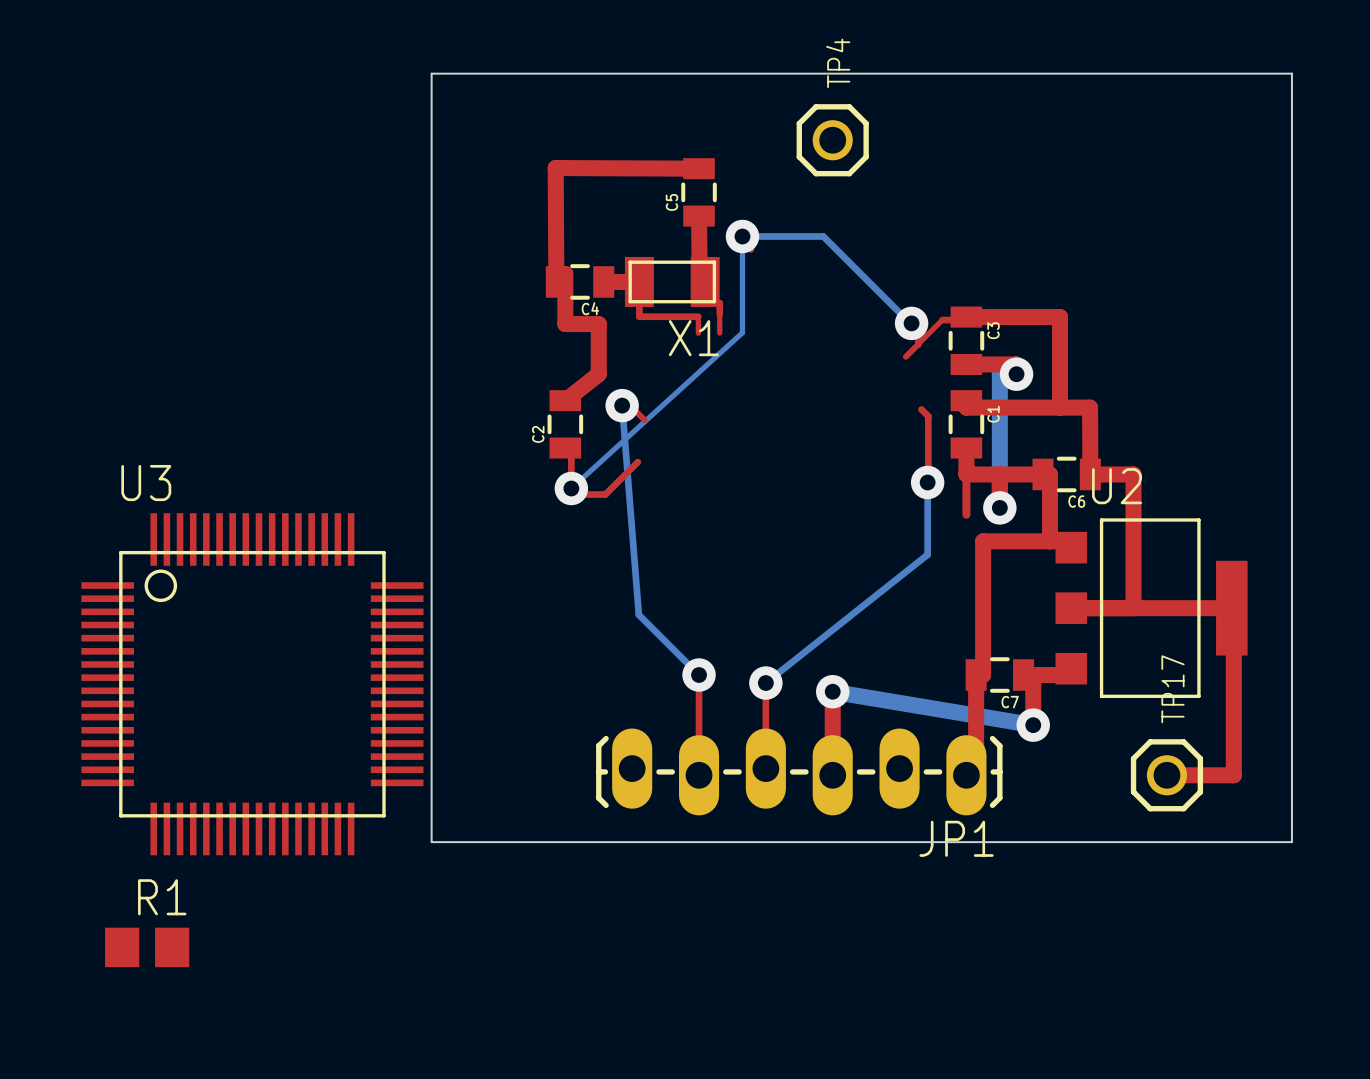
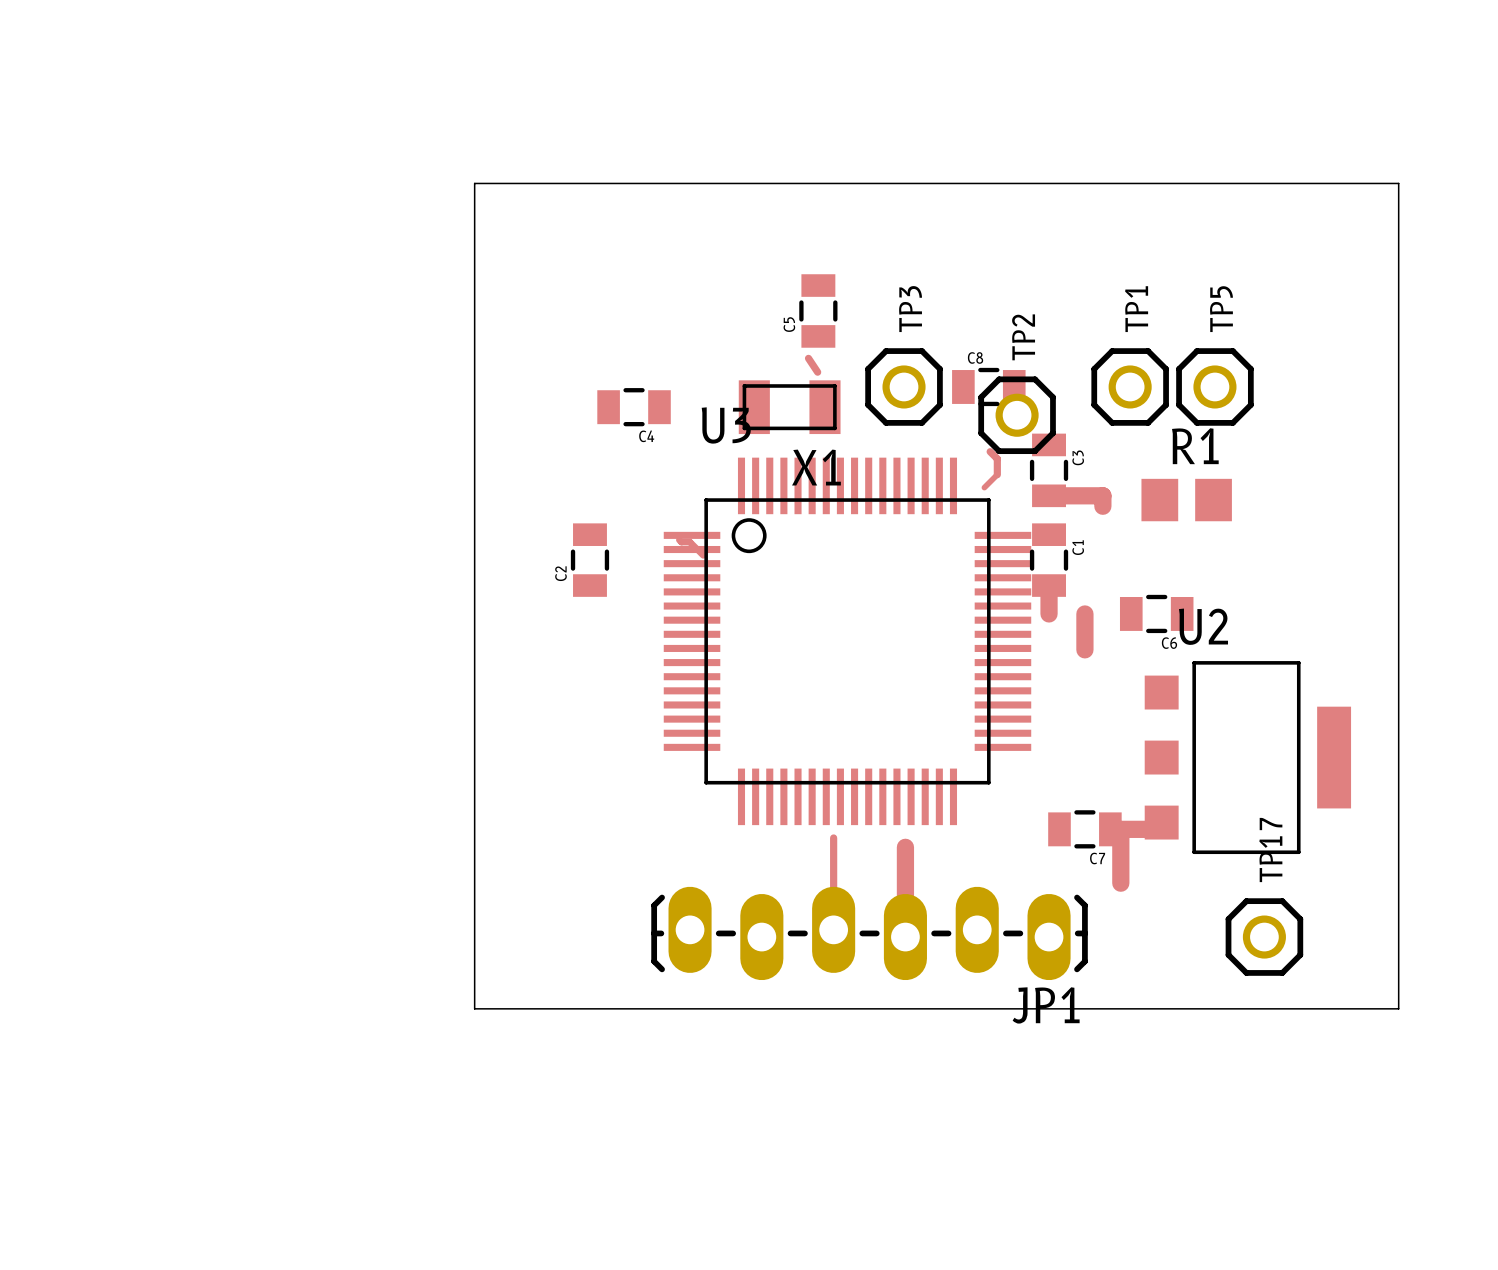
TP4: (832, 140) -> none
top track: (699, 168) (555, 168) (556, 281) (565, 273) (565, 324) (598, 324) (598, 374) -> none
C5 position: (699, 192) -> (818, 310)
top track: (699, 216) (699, 272) (715, 303) (719, 303) (719, 333) -> none
bottom track: (741, 236) (823, 236) (911, 323) -> none
bottom track: (742, 236) (742, 332) (571, 488) -> none
via: (742, 236) -> none
TP3: none -> (904, 386)
C8: none -> (988, 386)
TP1: none -> (1130, 386)
TP5: none -> (1214, 386)
top track: (603, 281) (639, 281) (639, 316) (698, 316) (698, 333) -> none
X1 position: (672, 281) -> (789, 407)
TP2: none -> (1017, 415)
via: (911, 323) -> none
top track: (905, 356) (942, 320) (963, 320) (966, 317) (1060, 317) (1060, 407) -> none
top track: (598, 374) (565, 400) (565, 398) -> none
bottom track: (1016, 374) (999, 374) (999, 507) -> none
via: (1016, 374) -> none
top track: (966, 398) (966, 407) (1090, 407) (1090, 474) (1133, 474) (1133, 608) -> none
bottom track: (622, 405) (638, 614) (699, 675) -> none
via: (622, 405) -> none
top track: (921, 409) (928, 416) (927, 482) -> none
C2 position: (565, 424) -> (589, 560)
top track: (565, 448) (571, 454) (571, 488) (577, 494) (605, 494) (637, 462) -> none
bottom track: (927, 482) (927, 554) (765, 683) -> none
via: (927, 482) -> none
via: (571, 488) -> none
via: (999, 507) -> none
top track: (966, 514) (966, 474) (1049, 474) (1049, 541) -> none
top track: (1071, 547) (1071, 541) (983, 541) (983, 675) (976, 675) (976, 775) (966, 775) -> none
top track: (1071, 608) (1233, 608) (1233, 775) (1166, 775) -> none
top track: (699, 675) (699, 775) -> none
via: (699, 675) -> none
via: (765, 683) -> none
U3 position: (252, 684) -> (847, 641)
bottom track: (832, 691) (1033, 725) -> none
via: (832, 691) -> none
via: (1033, 725) -> none
R1 position: (147, 947) -> (1186, 500)

